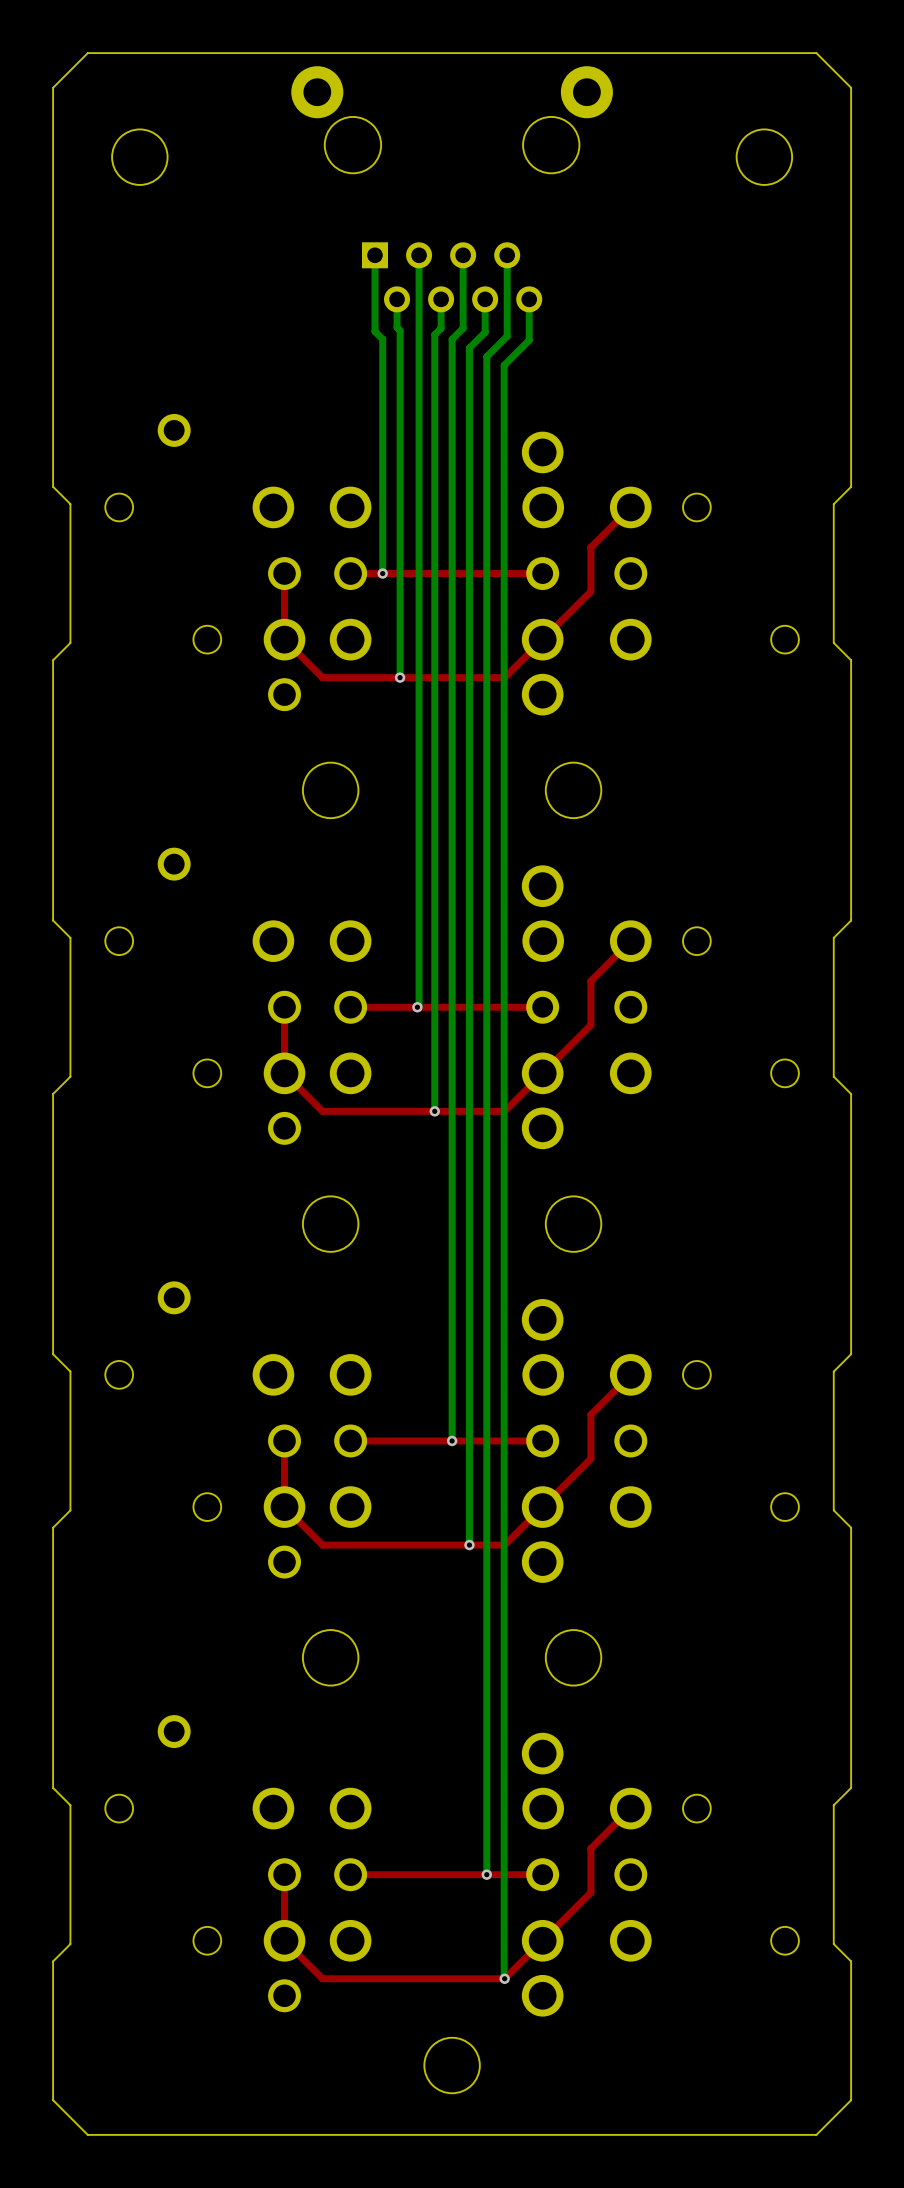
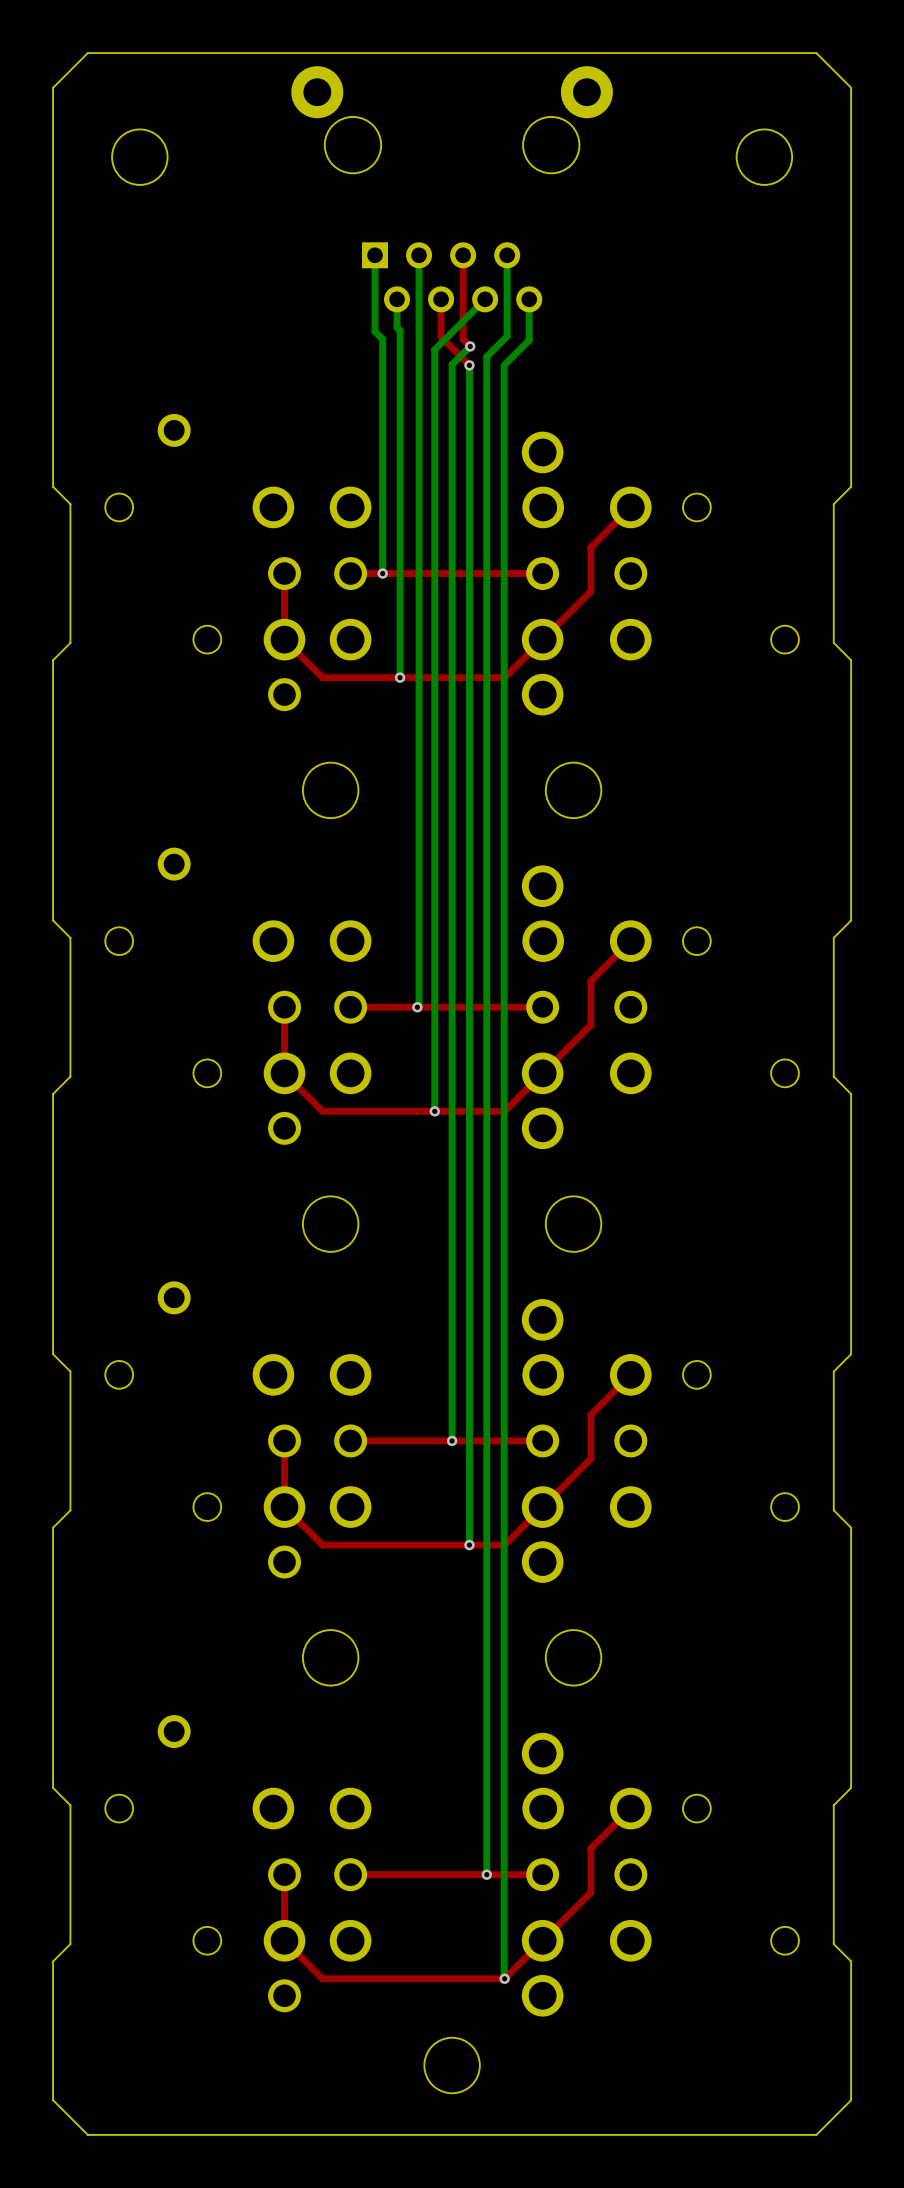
top track: none -> (463, 255) (463, 339) (470, 346)
bottom track: (463, 255) (463, 328) (452, 339) (452, 364) -> (470, 346) (452, 364)
top track: none -> (441, 299) (441, 337) (469, 365)
bottom track: (441, 299) (441, 328) (434, 334) (434, 349) -> none
bottom track: (485, 299) (485, 332) (469, 348) (469, 365) -> (485, 299) (434, 349)
via: none -> (470, 346)
via: none -> (469, 365)

